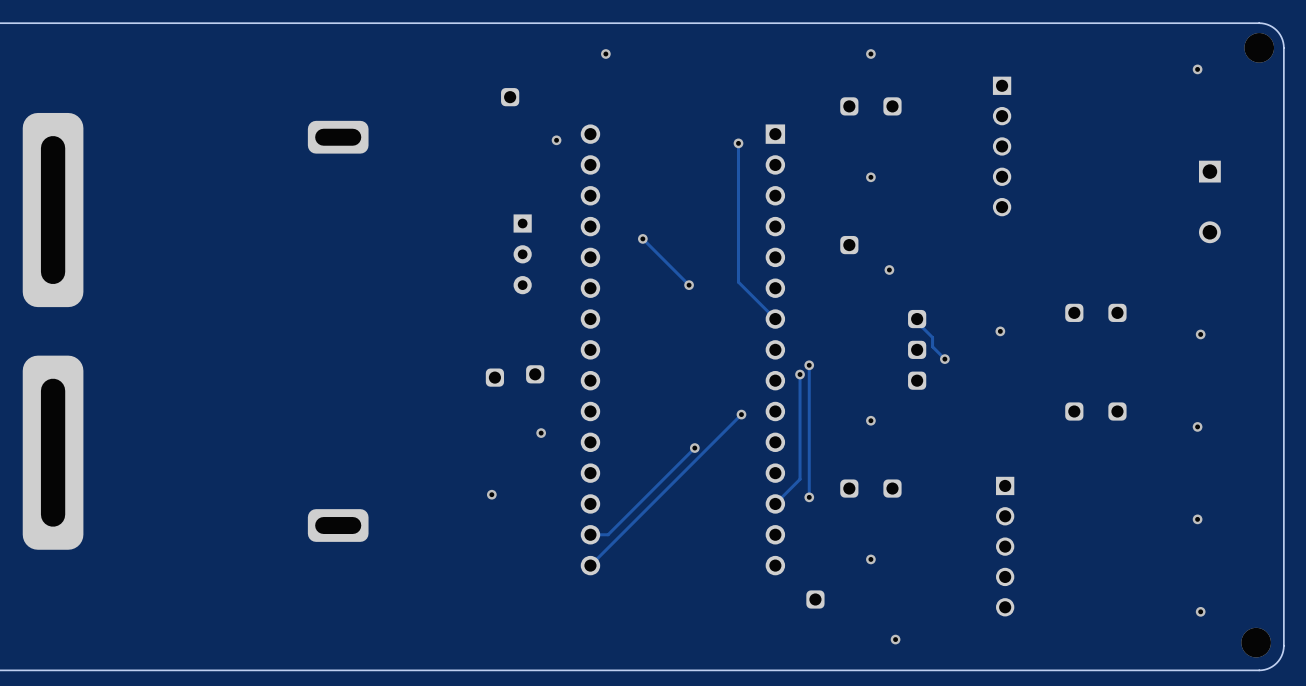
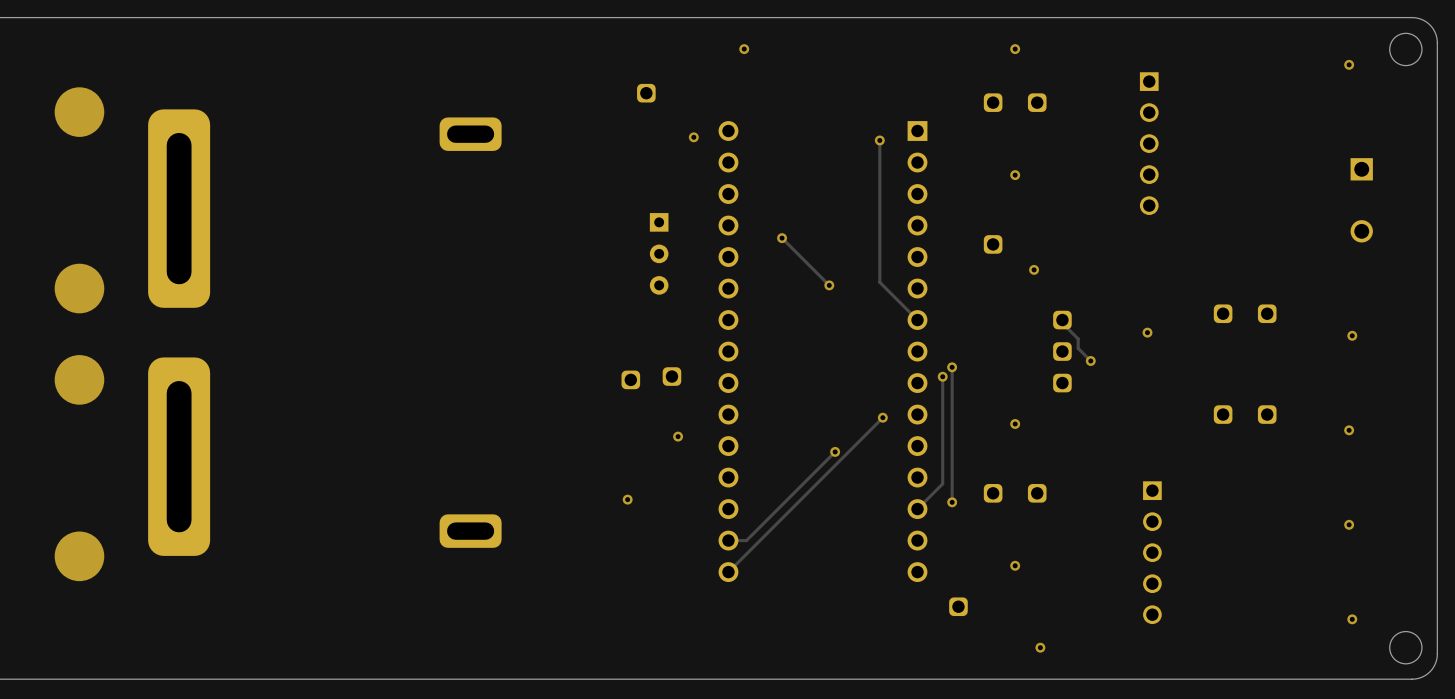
round board edge: none -> [1389, 32, 1423, 67]
part: (1259, 47) -> none
round board edge: none -> [1389, 630, 1423, 665]
part: (1256, 642) -> none

